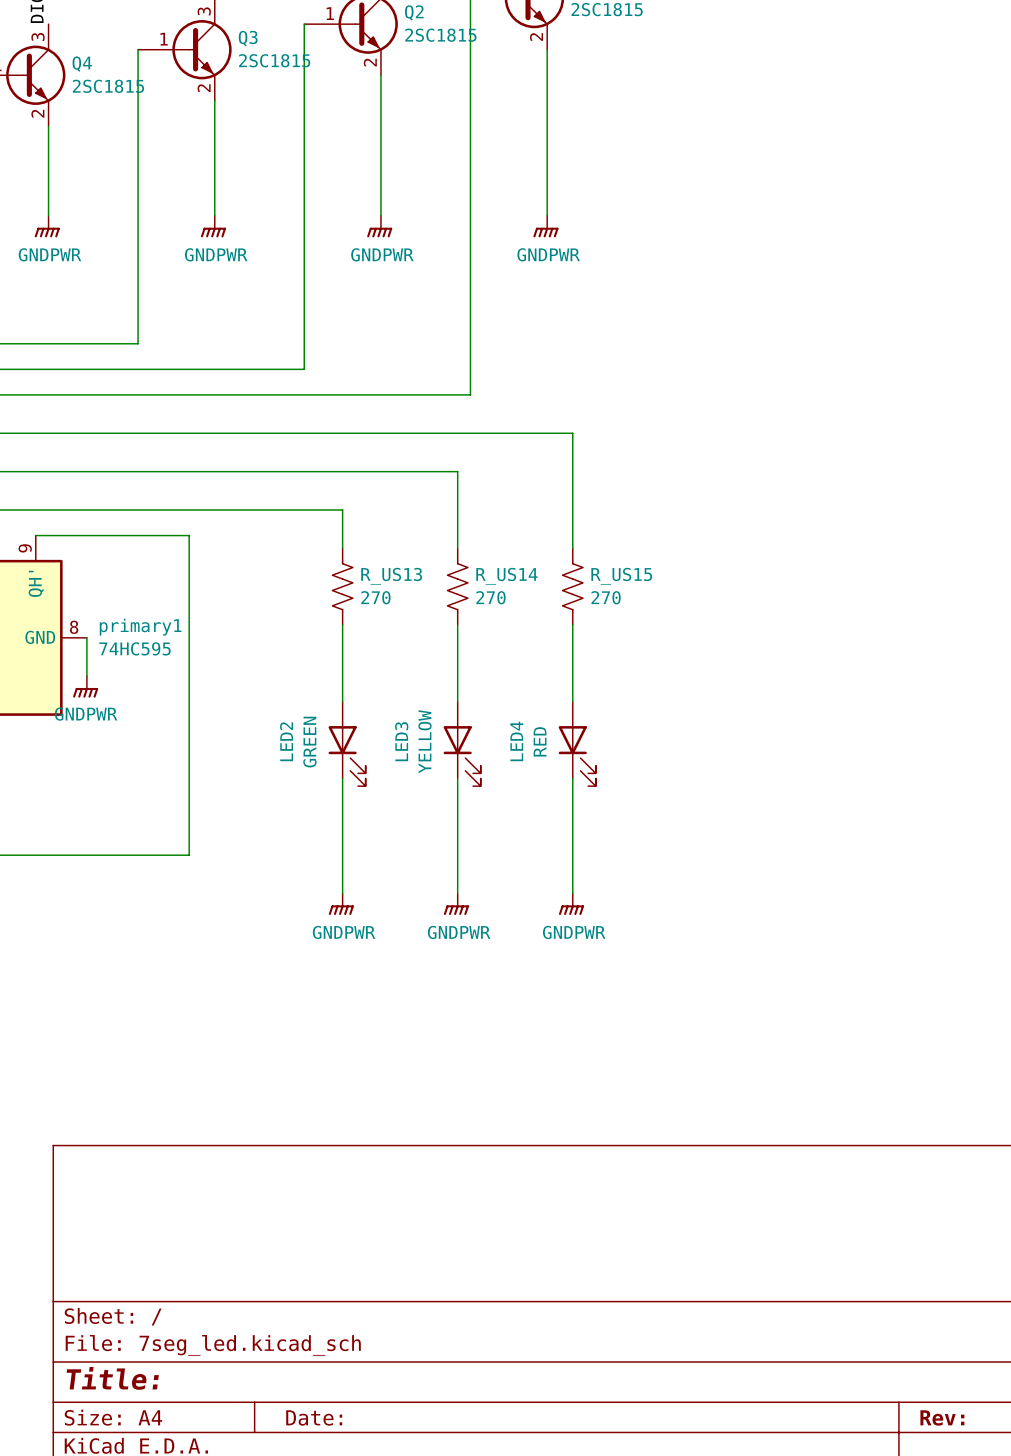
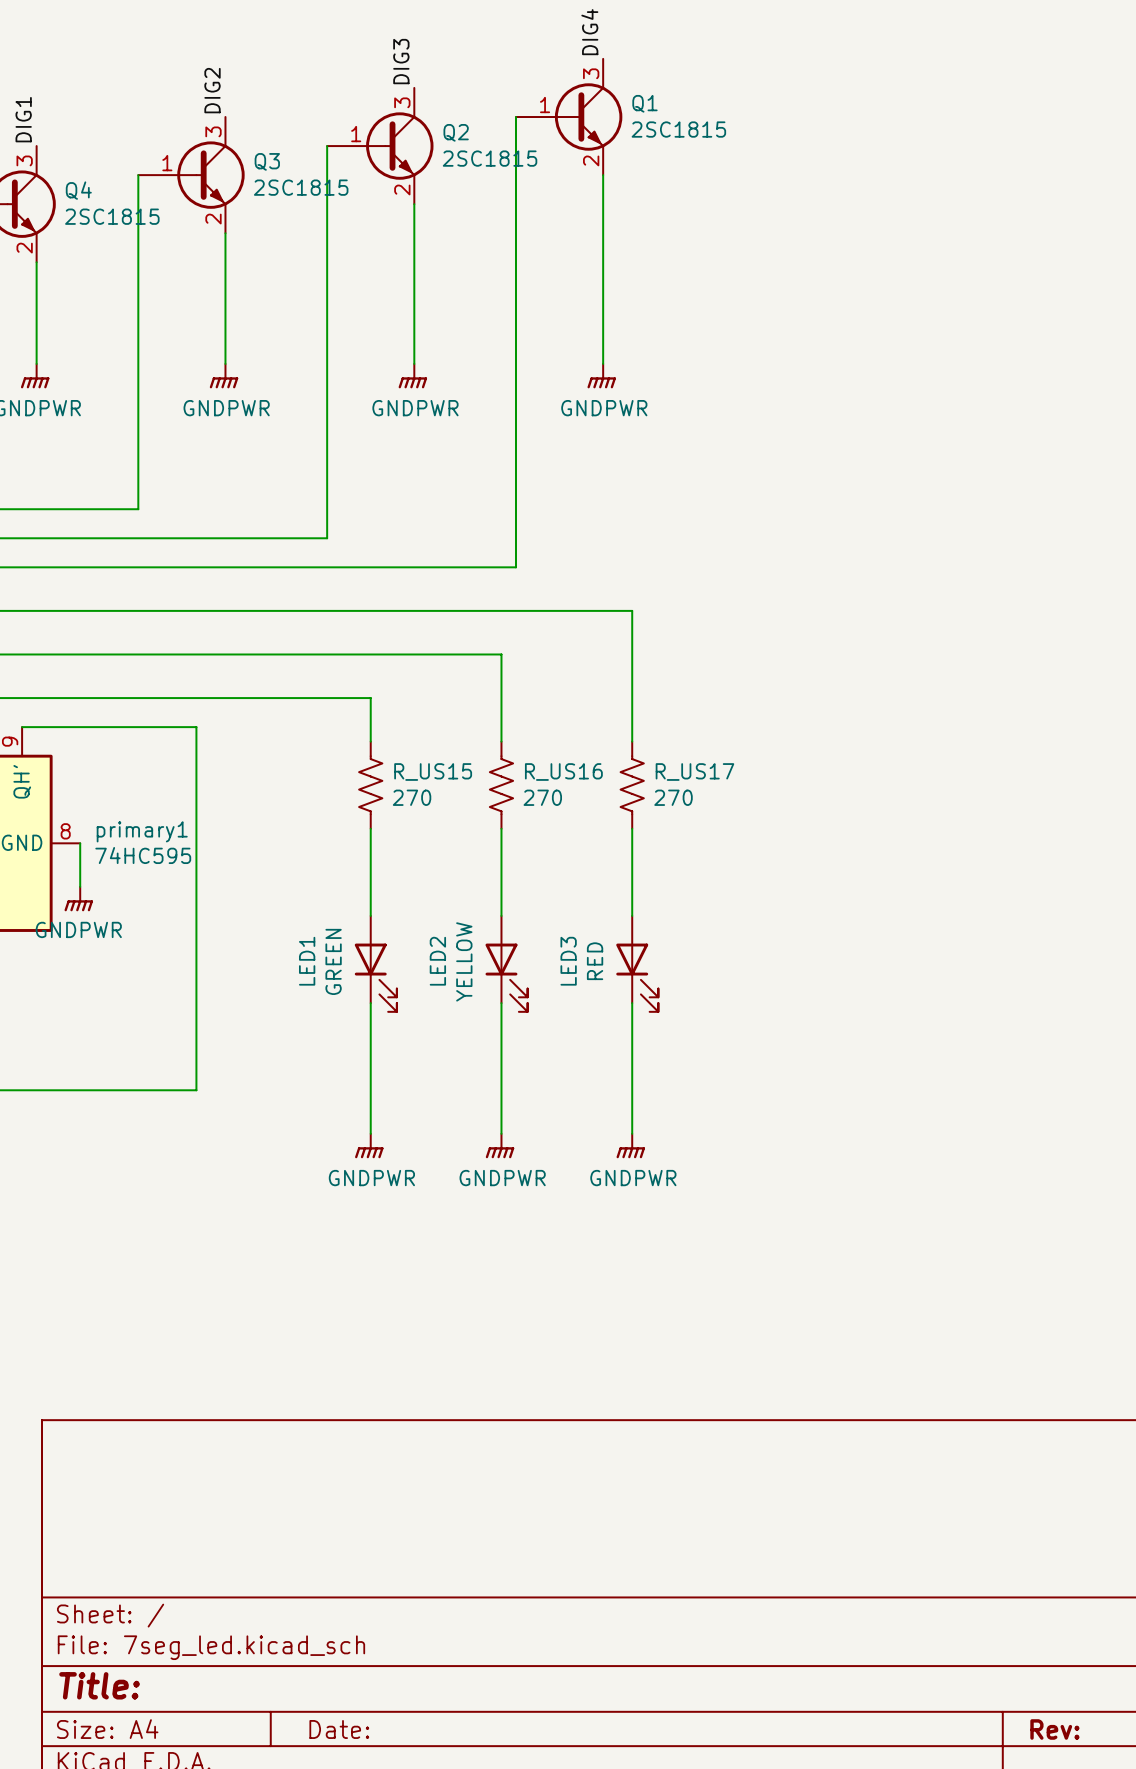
R_US13 name: R_US13 (391, 576) -> R_US15 (433, 772)
R_US14 name: R_US14 (506, 576) -> R_US16 (563, 772)
R_US15 name: R_US15 (621, 576) -> R_US17 (694, 772)
LED2 name: LED2 (286, 741) -> LED1 (307, 961)
LED3 name: LED3 (401, 741) -> LED2 (437, 961)
LED4 name: LED4 (516, 741) -> LED3 (568, 961)

